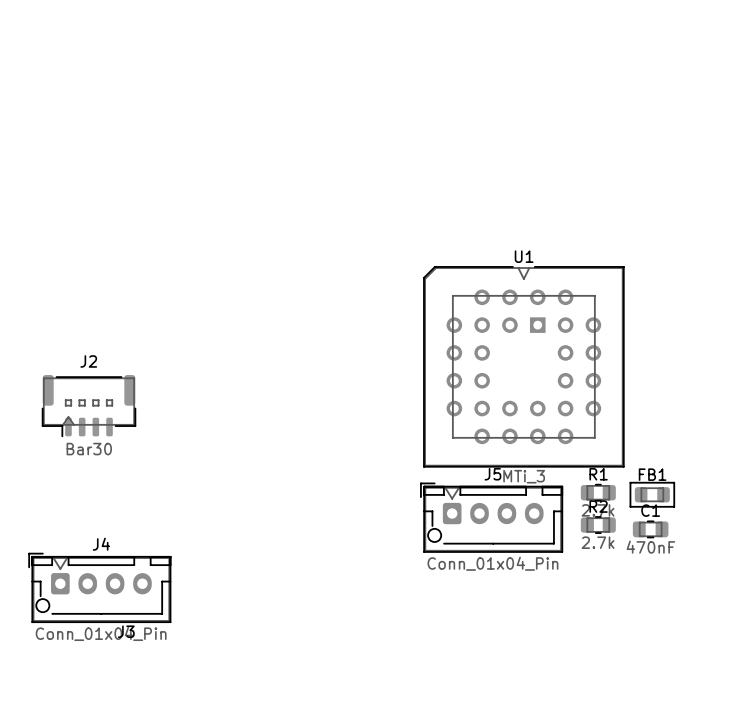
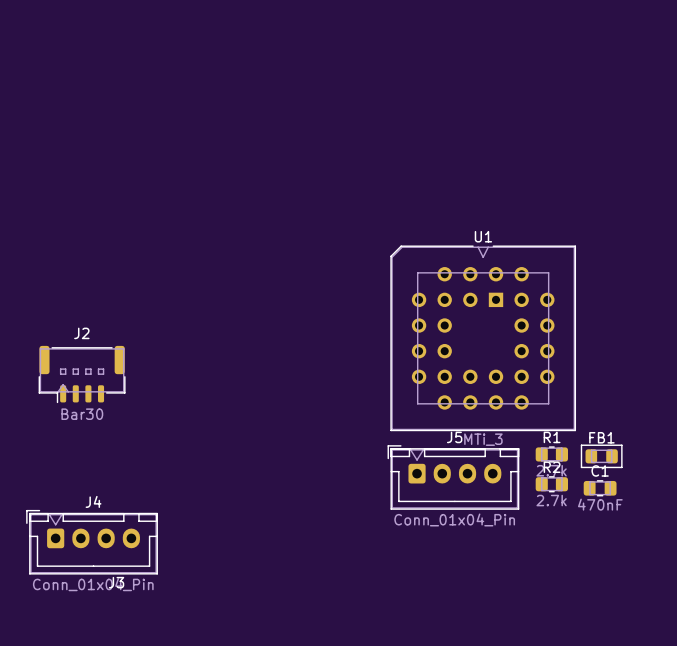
J5 footprint: [420, 482, 563, 553] -> [387, 445, 520, 510]
J4 footprint: [28, 552, 172, 623] -> [26, 510, 158, 575]

